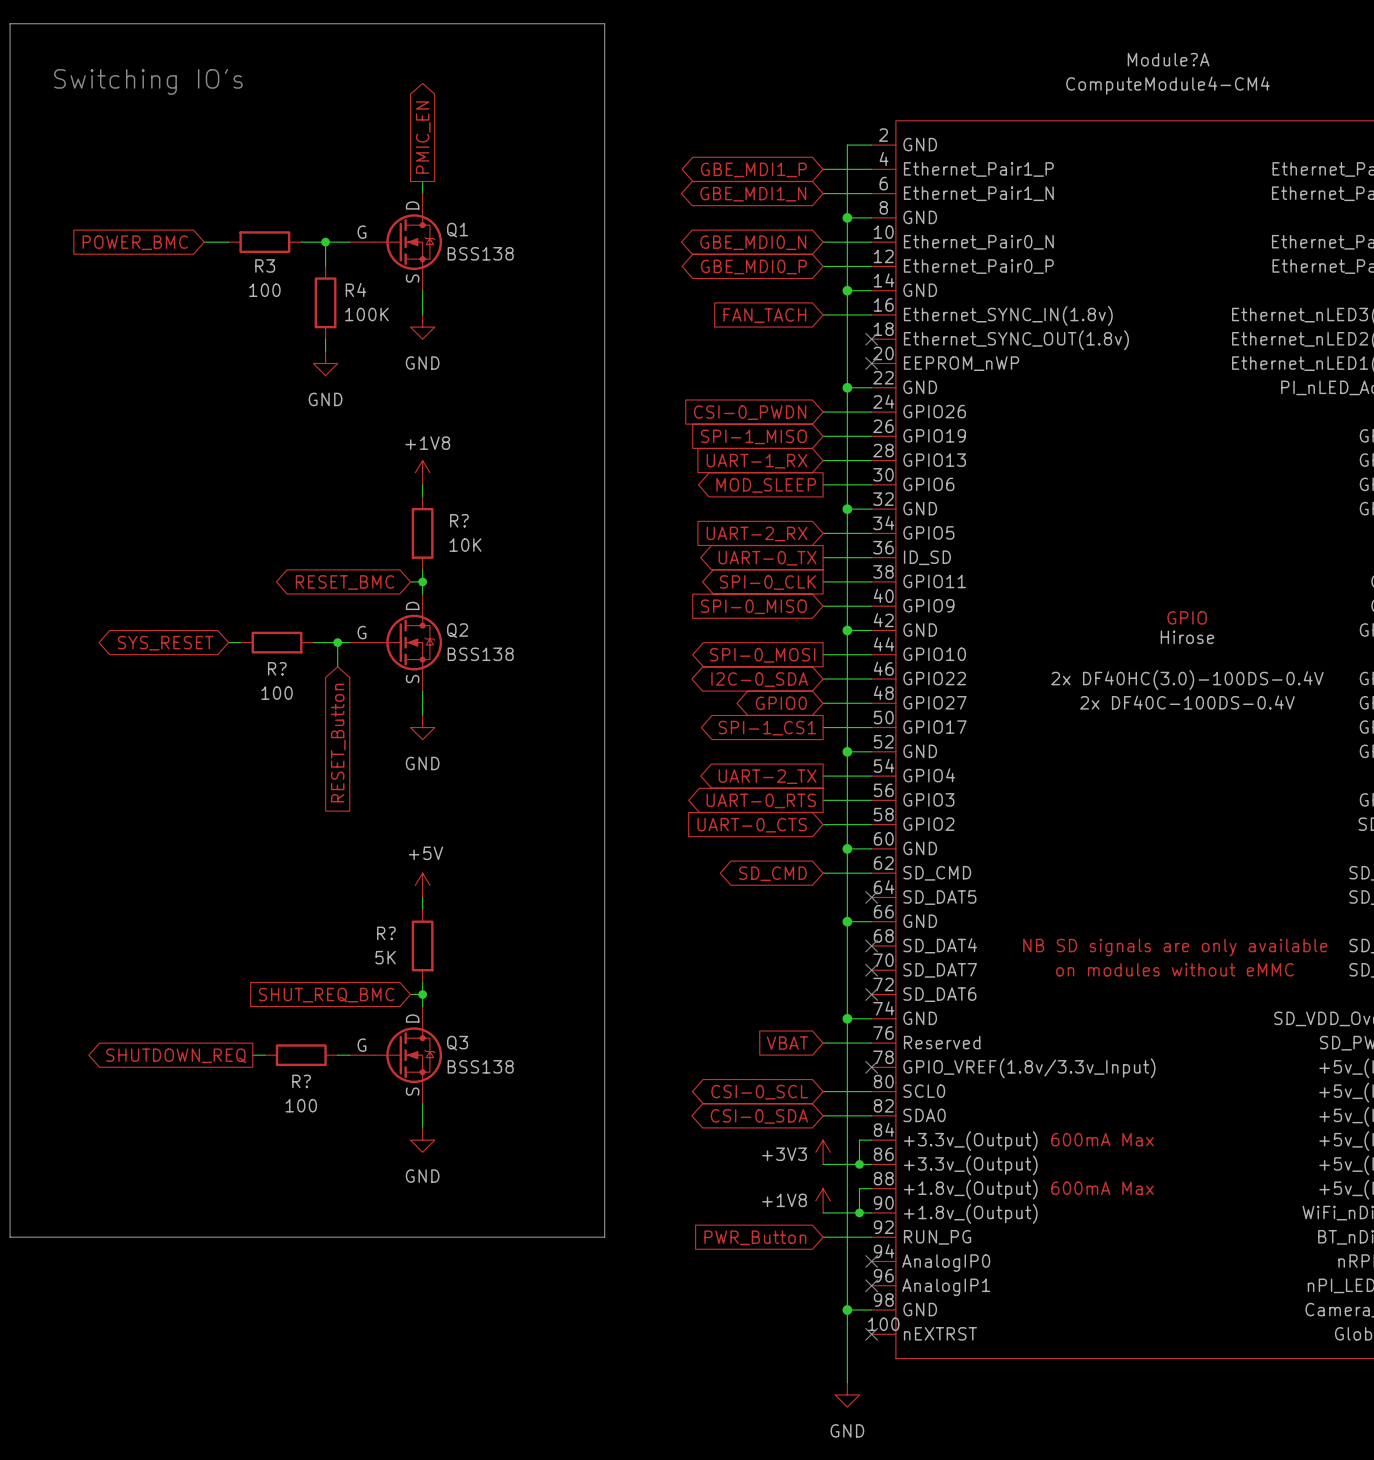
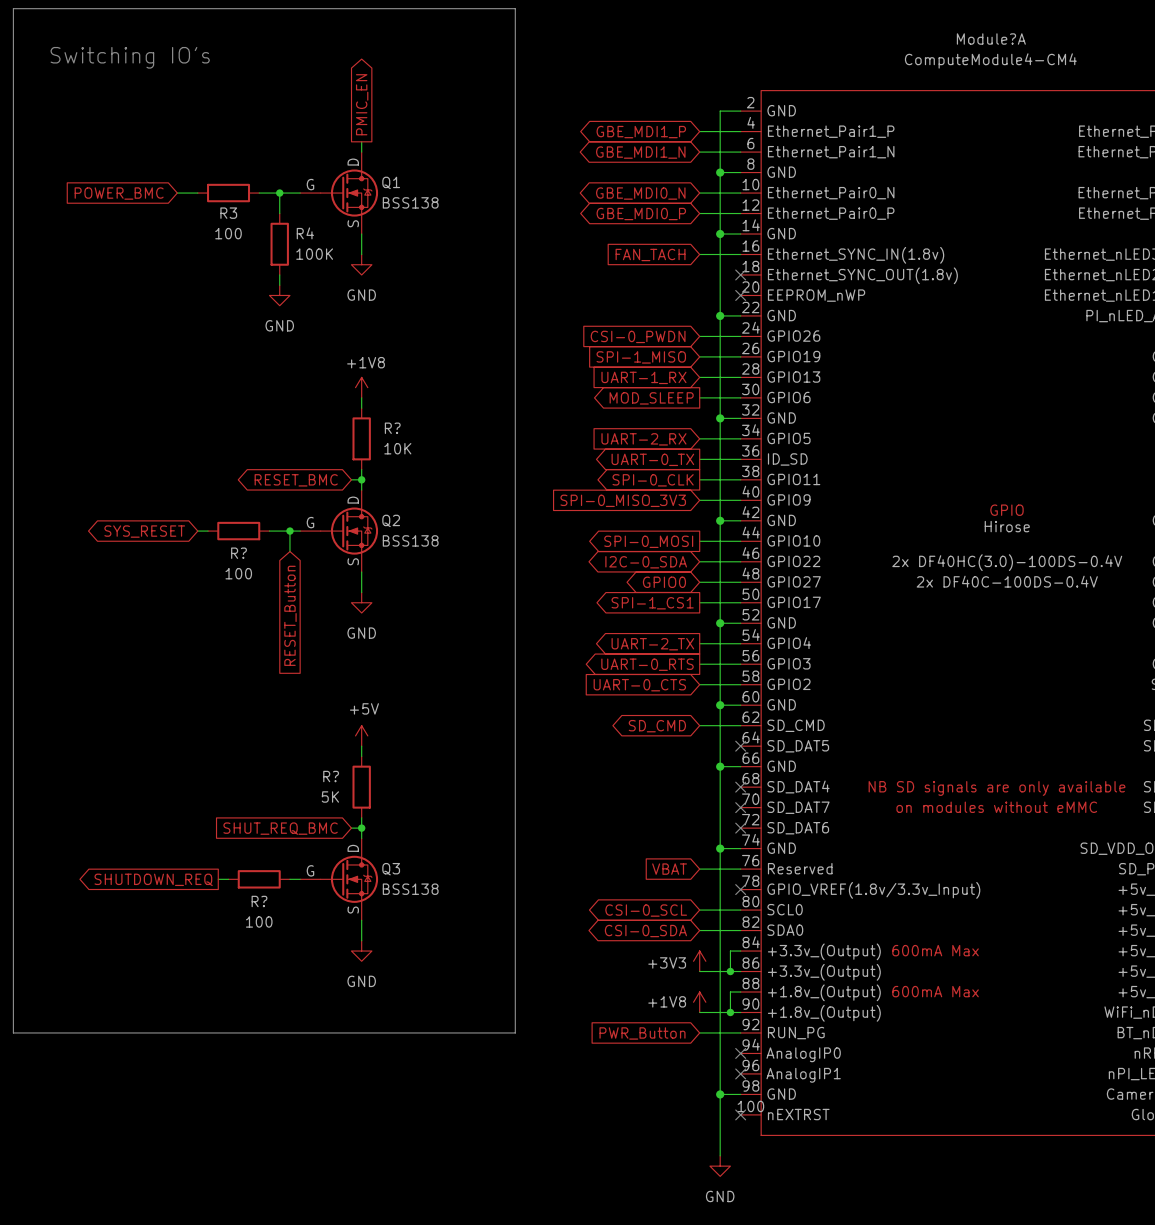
global label: SPI-0_MISO (753, 606) -> SPI-0_MISO_3V3 (623, 500)

